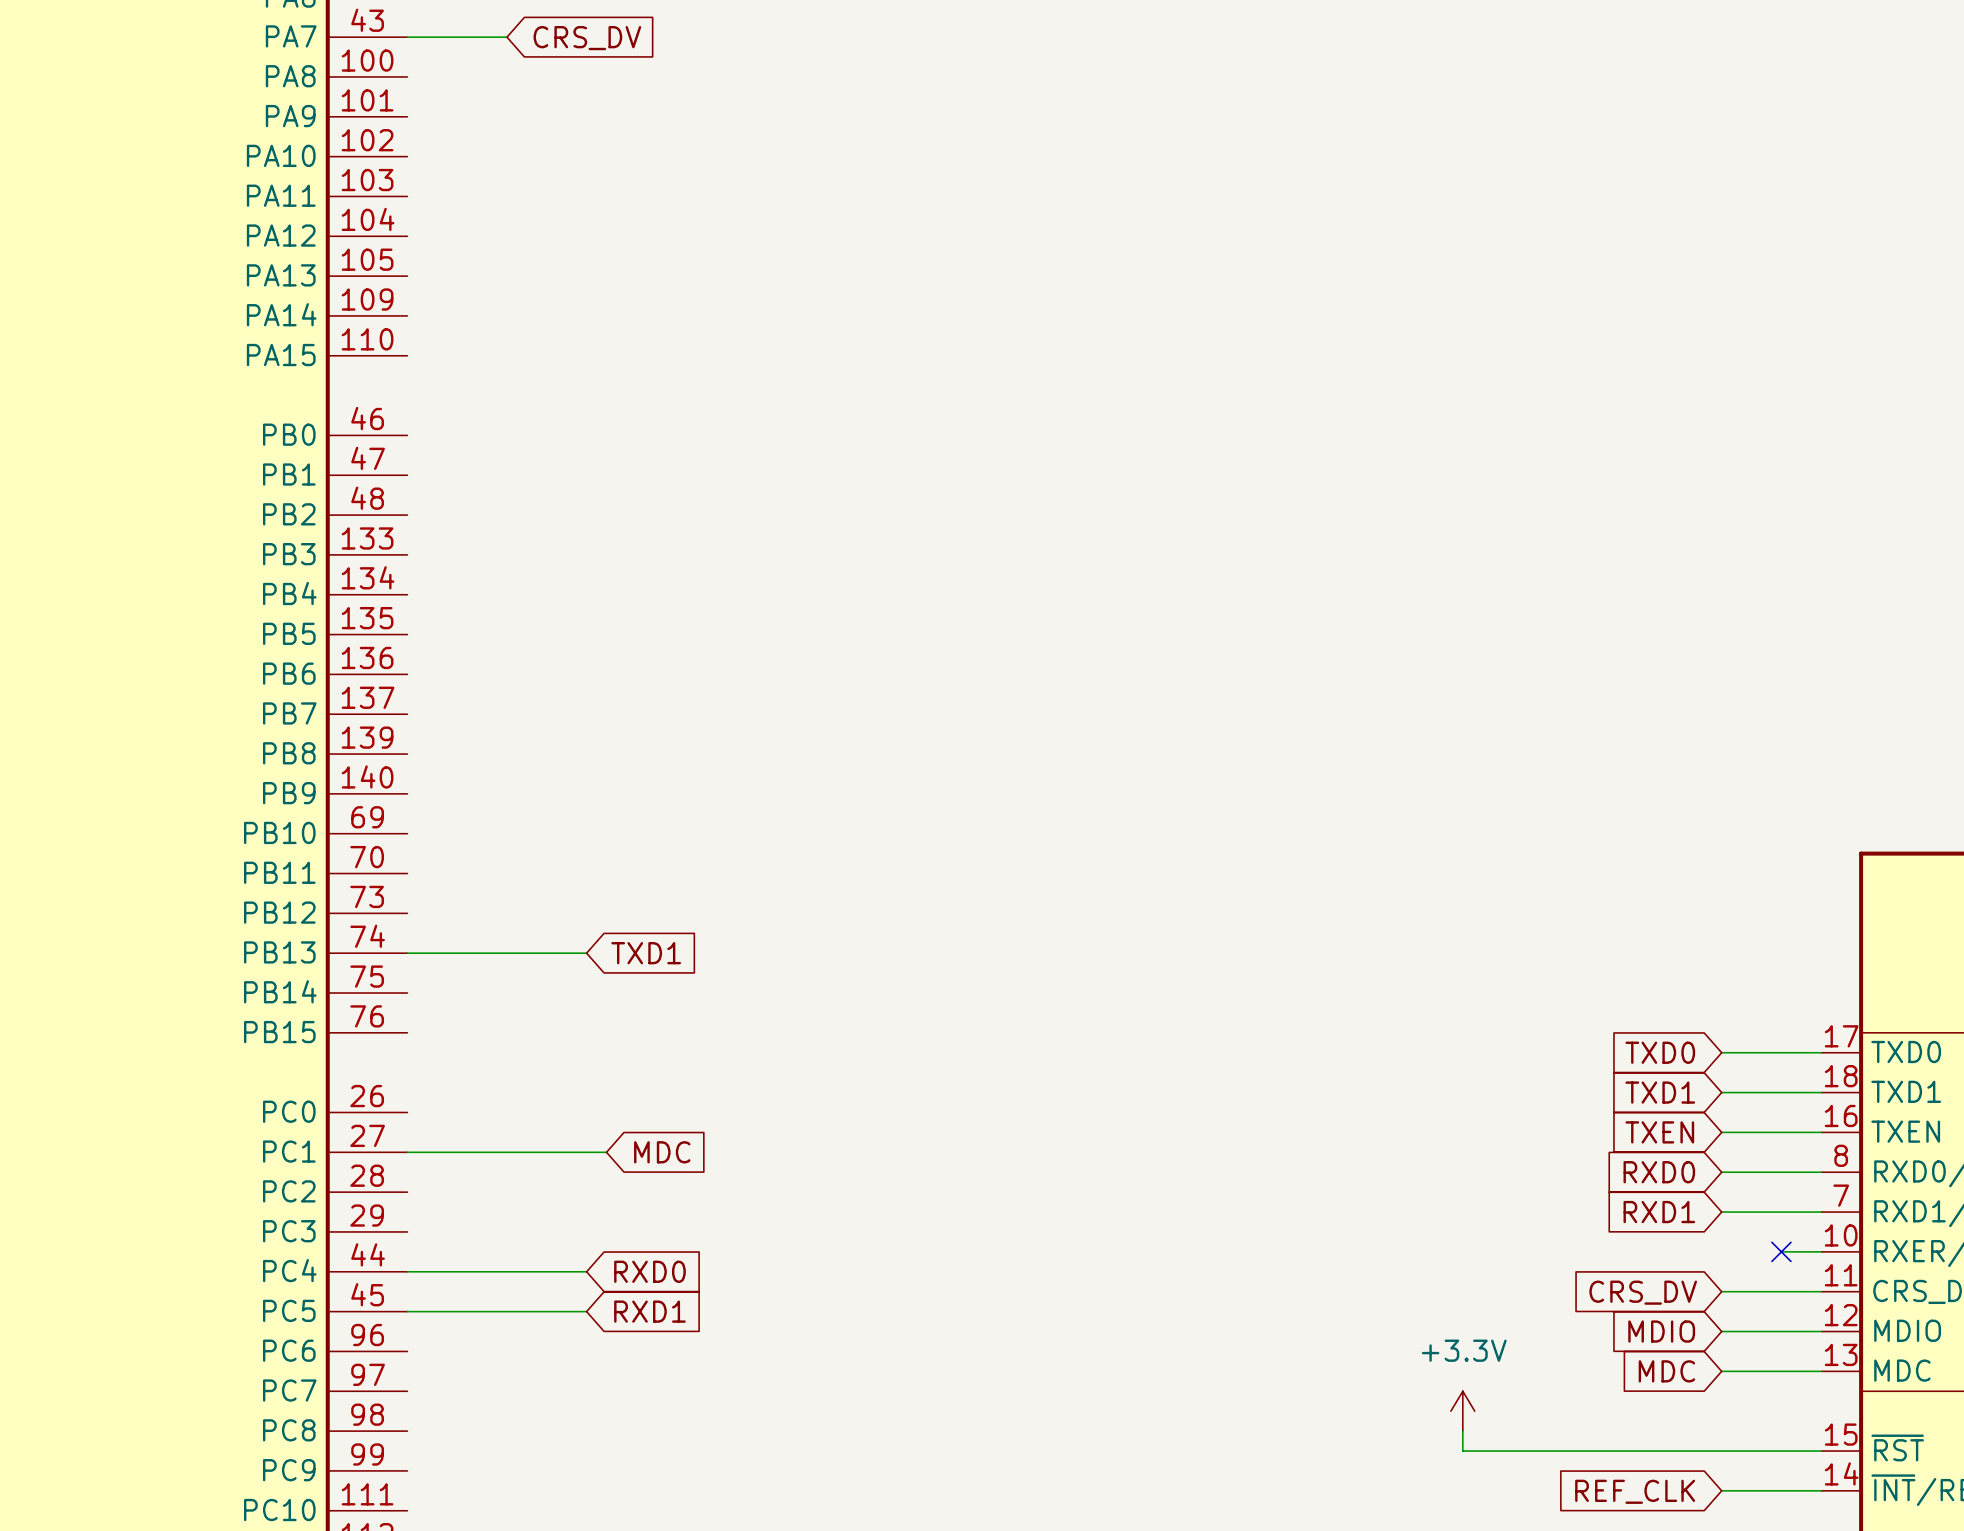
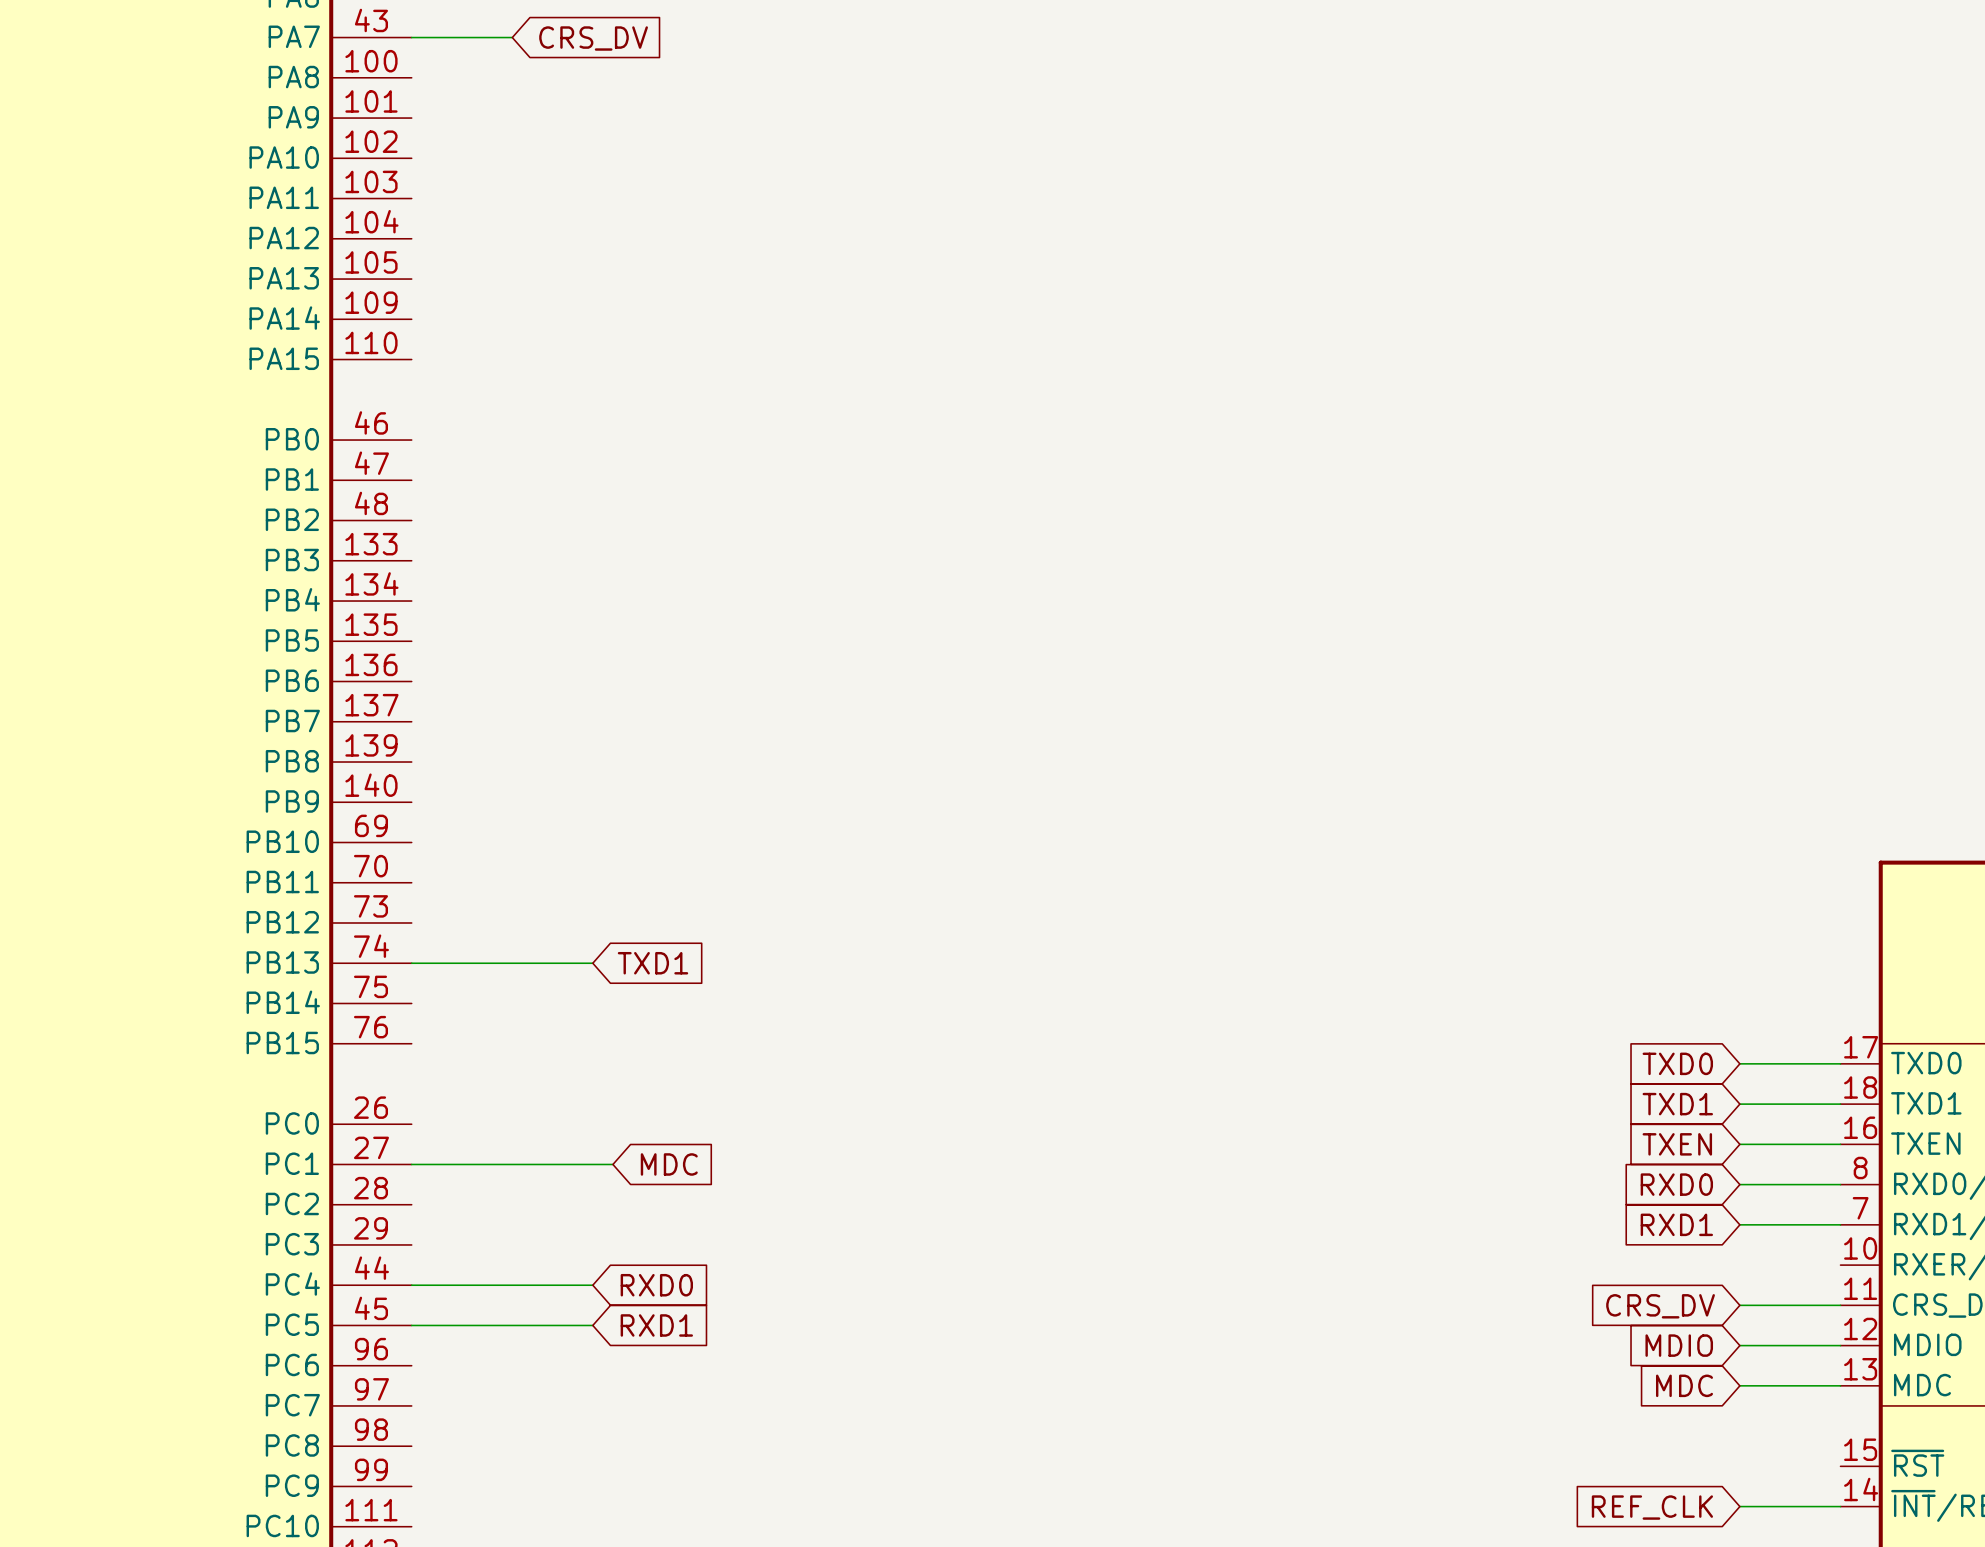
wire: (1781, 1251) (1821, 1251) -> none
no-connect mark: (1781, 1251) -> none
power symbol: +3.3V (1462, 1411) -> none
wire: (1462, 1431) (1462, 1451) (1821, 1451) -> none

